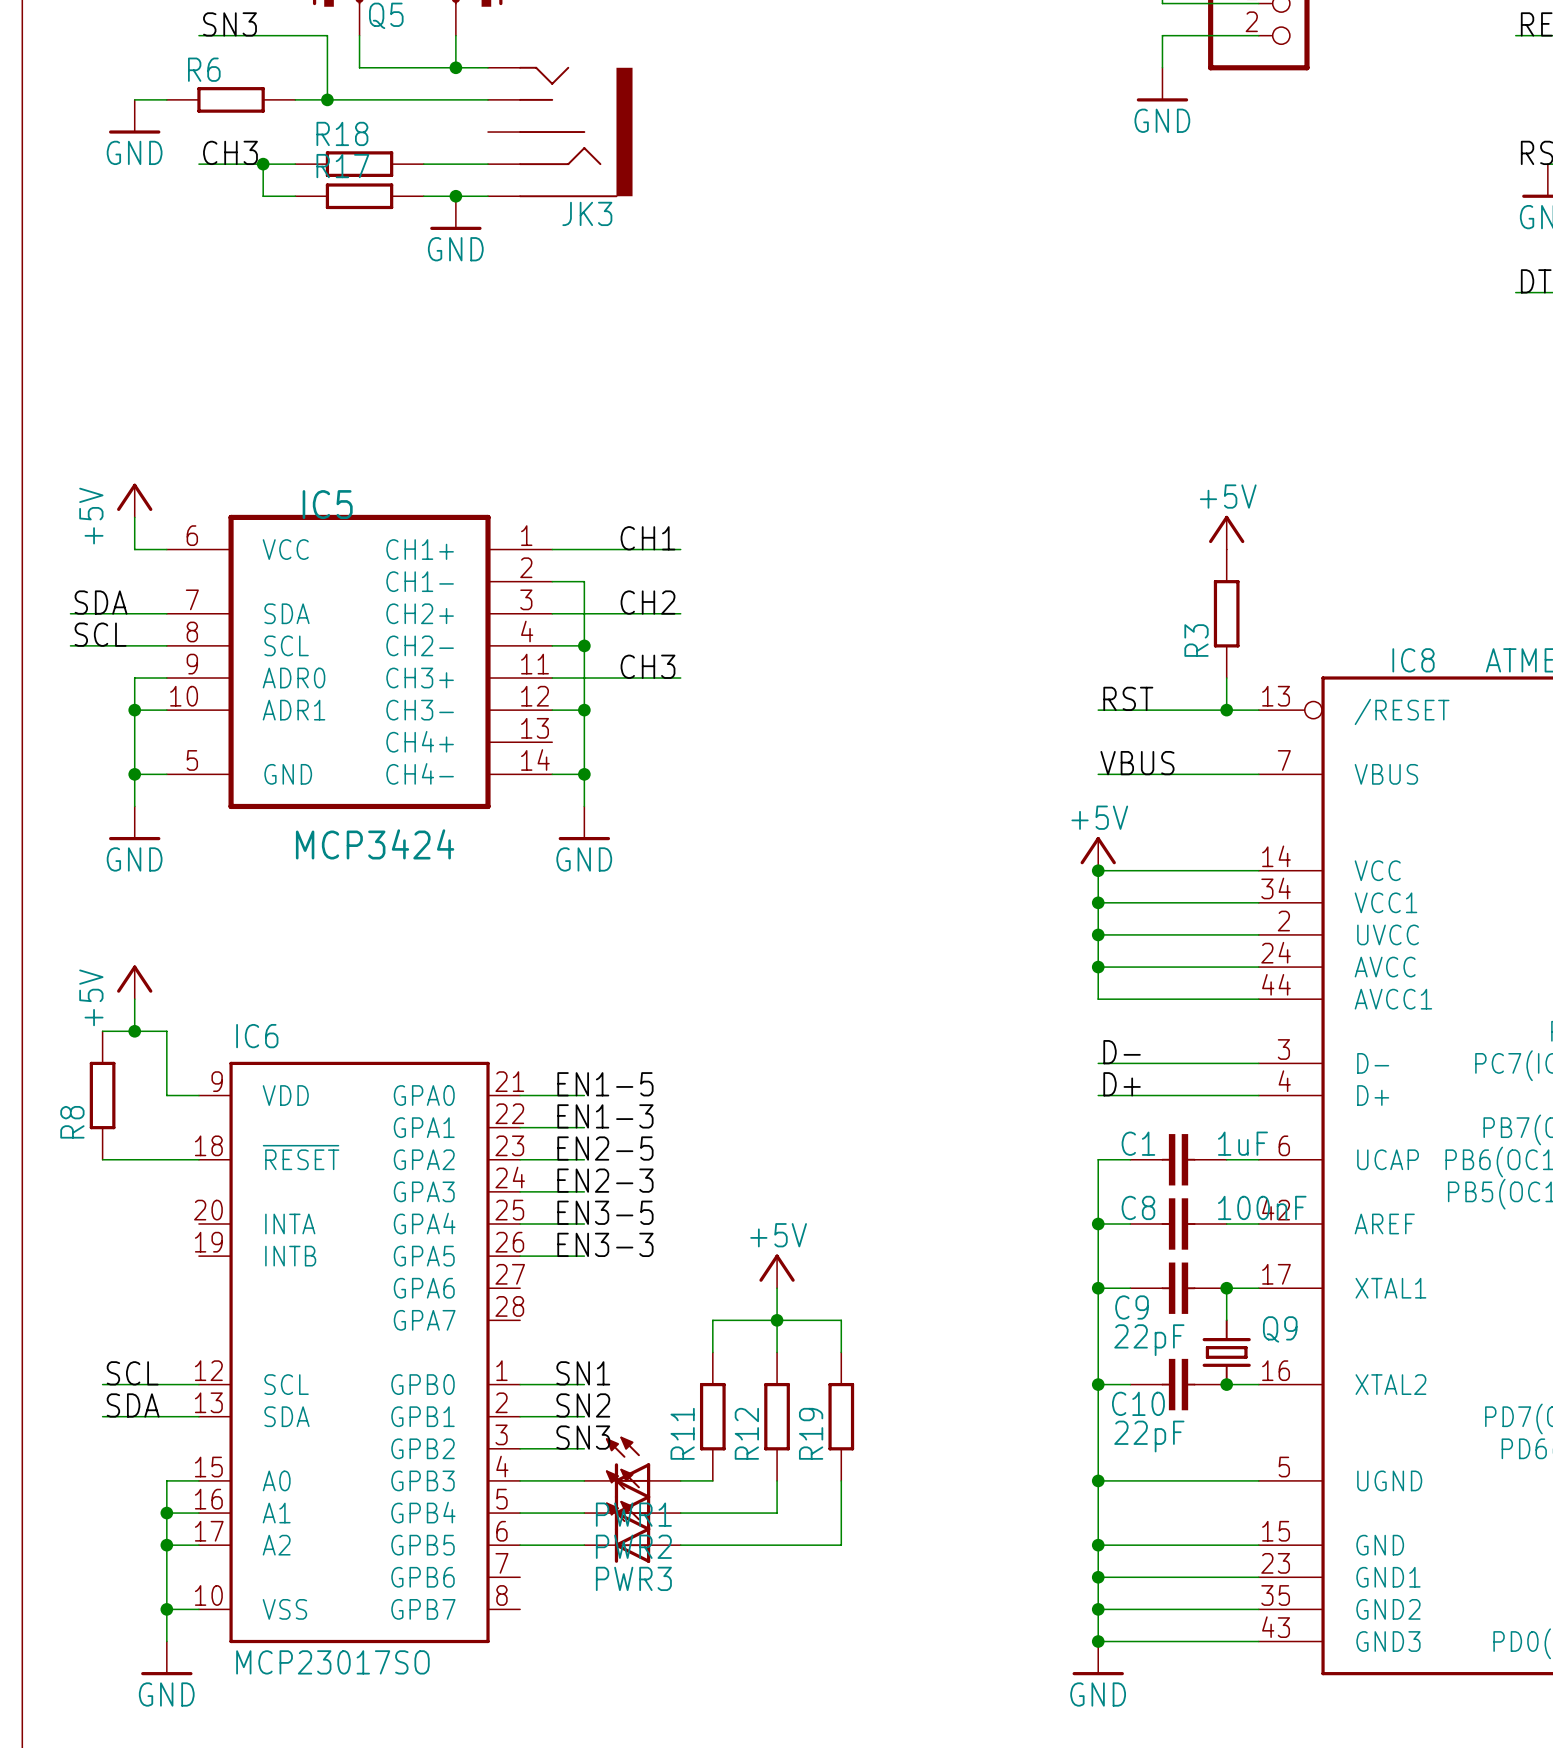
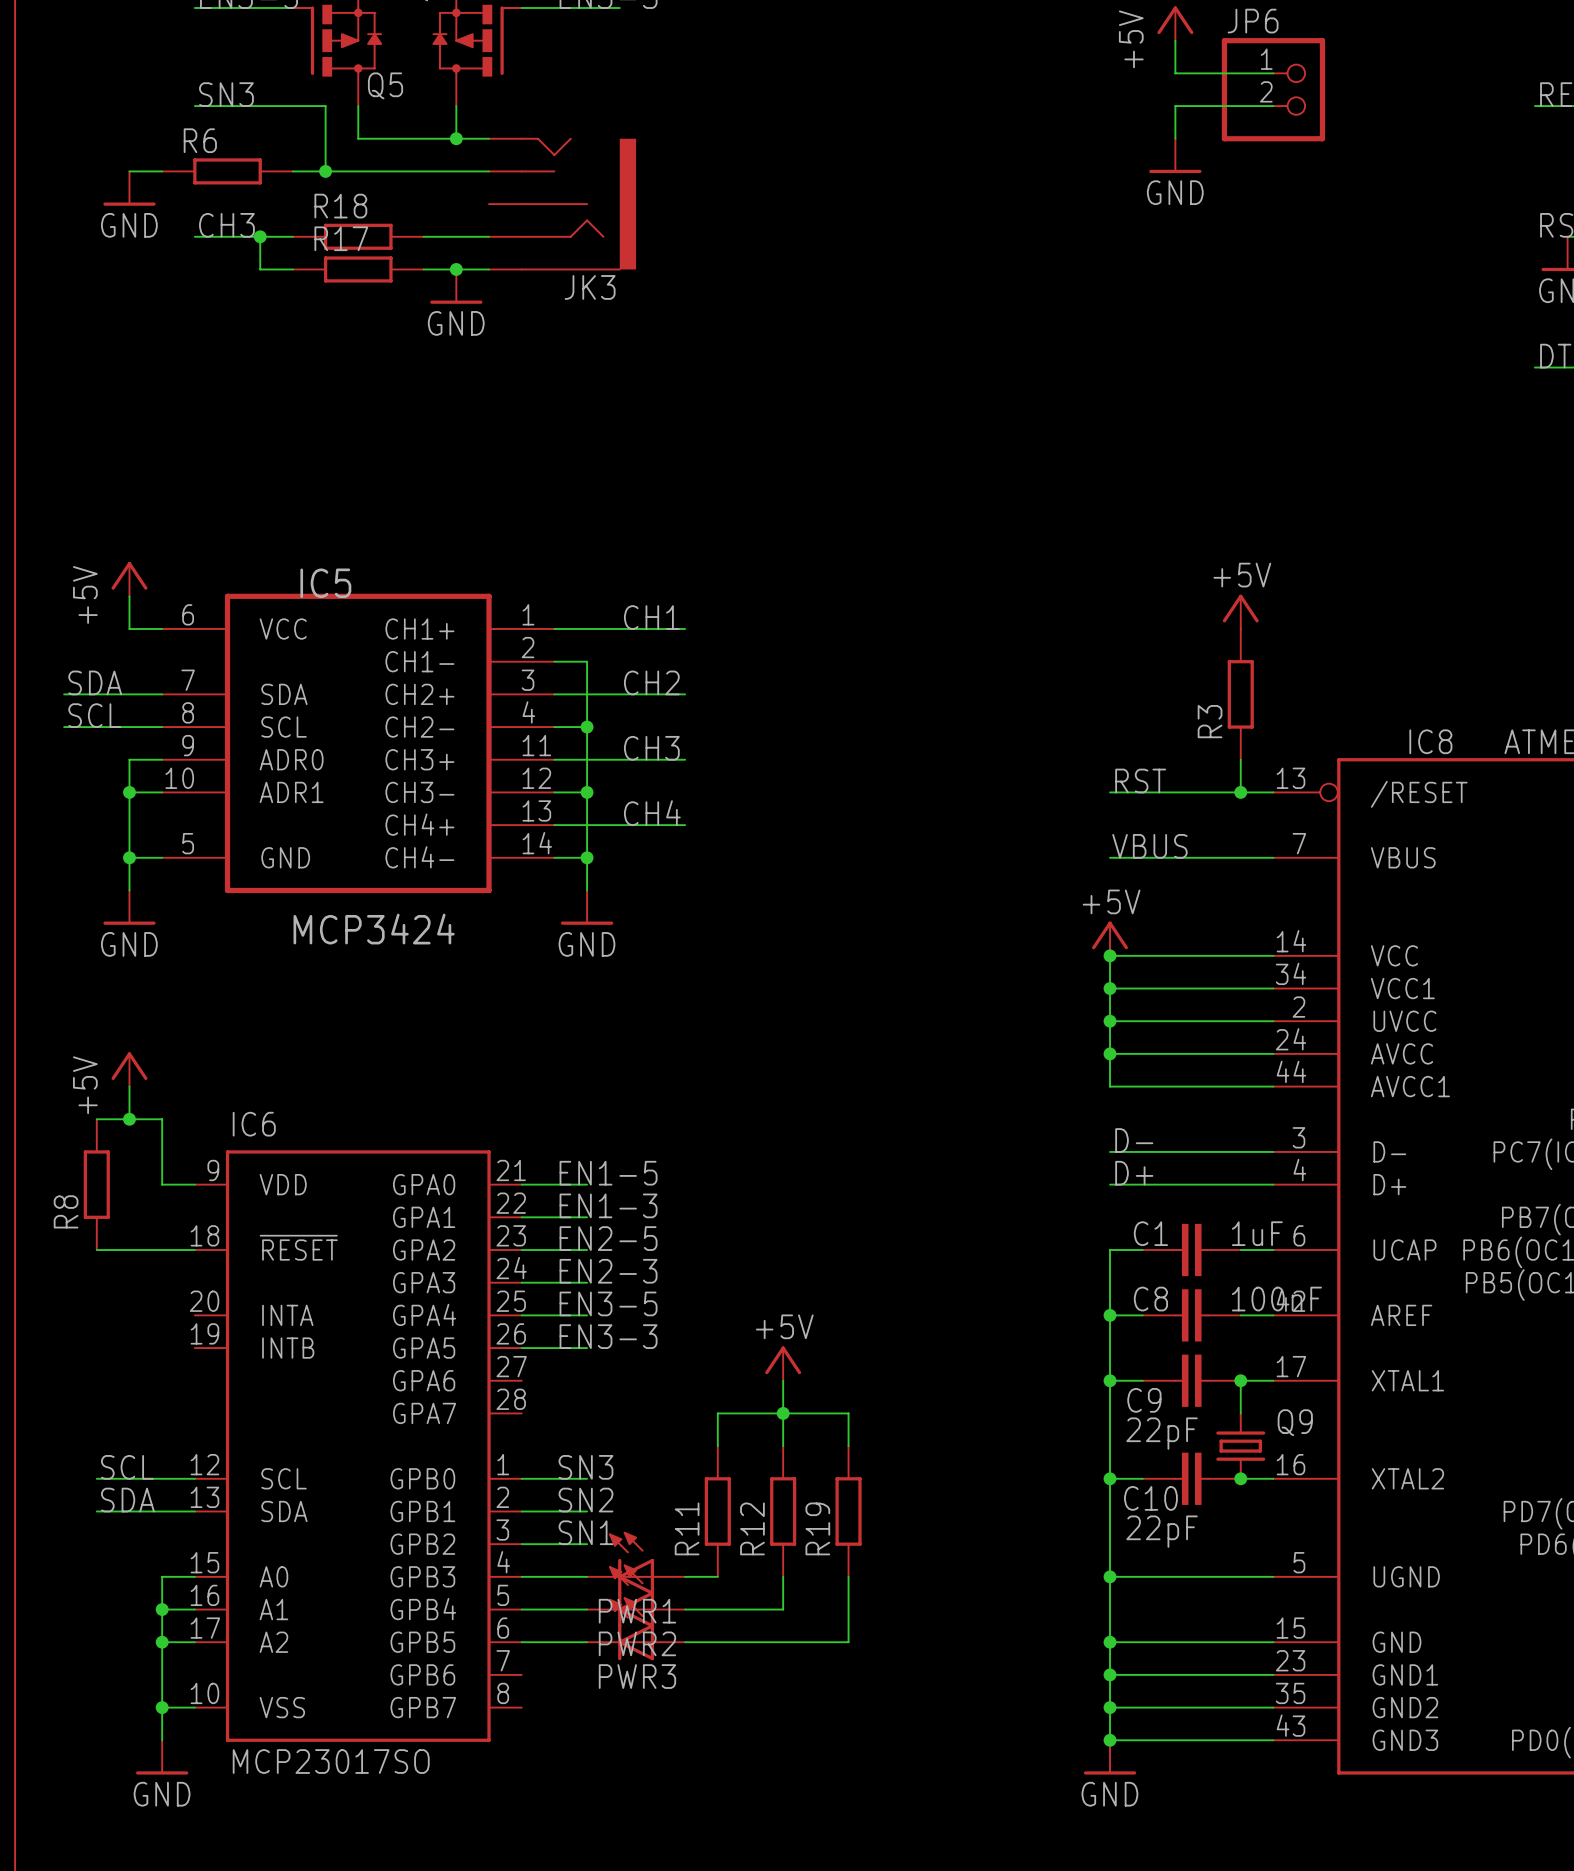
label: none -> CH4 (652, 813)
wire: none -> (554, 825) (685, 825)
label: SN1 (583, 1373) -> SN3 (585, 1467)
label: SN3 (583, 1437) -> SN1 (585, 1532)

